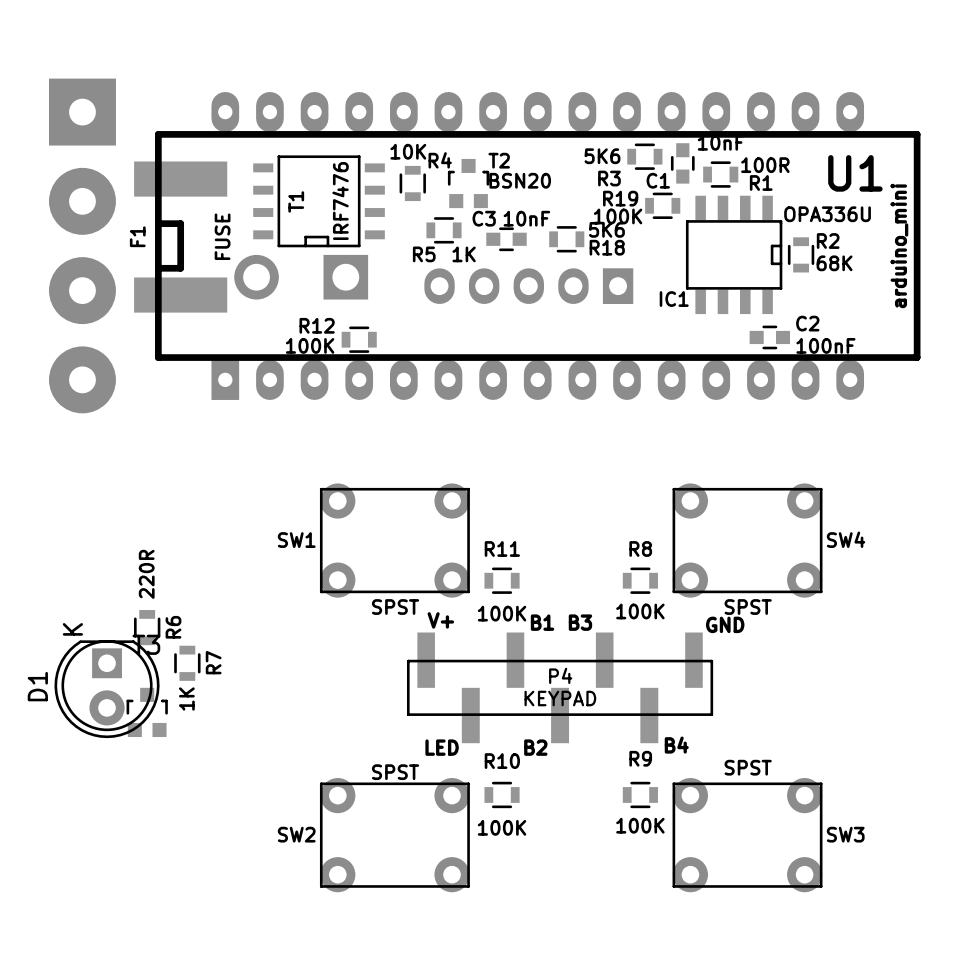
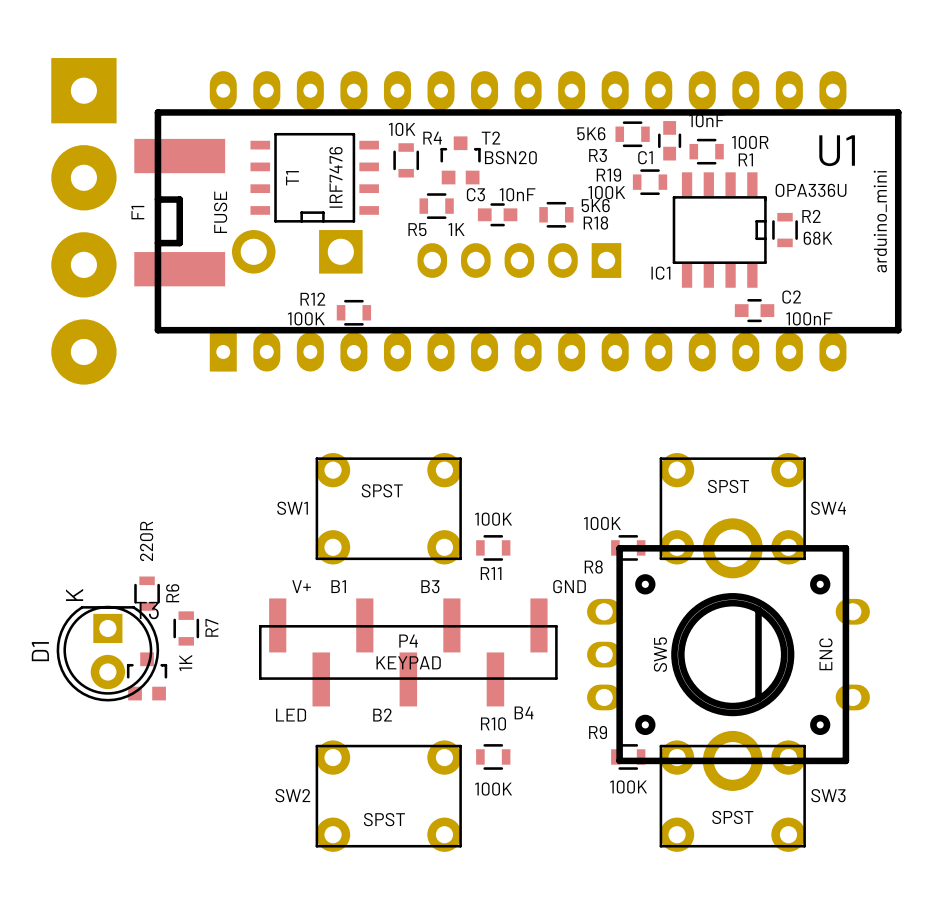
R11 name position: R11 (502, 548) -> R11 (491, 573)
R8 name position: R8 (640, 548) -> R8 (593, 567)
SW1 value position: SPST (395, 607) -> SPST (382, 490)
SW4 value position: SPST (748, 607) -> SPST (728, 486)
R8 value position: 100K (640, 611) -> 100K (602, 523)
R11 value position: 100K (502, 613) -> 100K (493, 519)
text position: V+ (440, 620) -> V+ (301, 586)
text position: B1 (542, 622) -> B1 (338, 586)
text position: B3 (580, 622) -> B3 (430, 586)
text position: GND (725, 624) -> GND (569, 586)
P4 position: (560, 687) -> (408, 652)
SW5: none -> ENC (728, 654)
text position: B4 (676, 745) -> B4 (524, 712)
text position: LED (442, 747) -> LED (291, 715)
text position: B2 (535, 747) -> B2 (382, 715)
R9 name position: R9 (640, 758) -> R9 (598, 732)
SW3 value position: SPST (748, 767) -> SPST (732, 817)
SW2 value position: SPST (395, 772) -> SPST (384, 819)

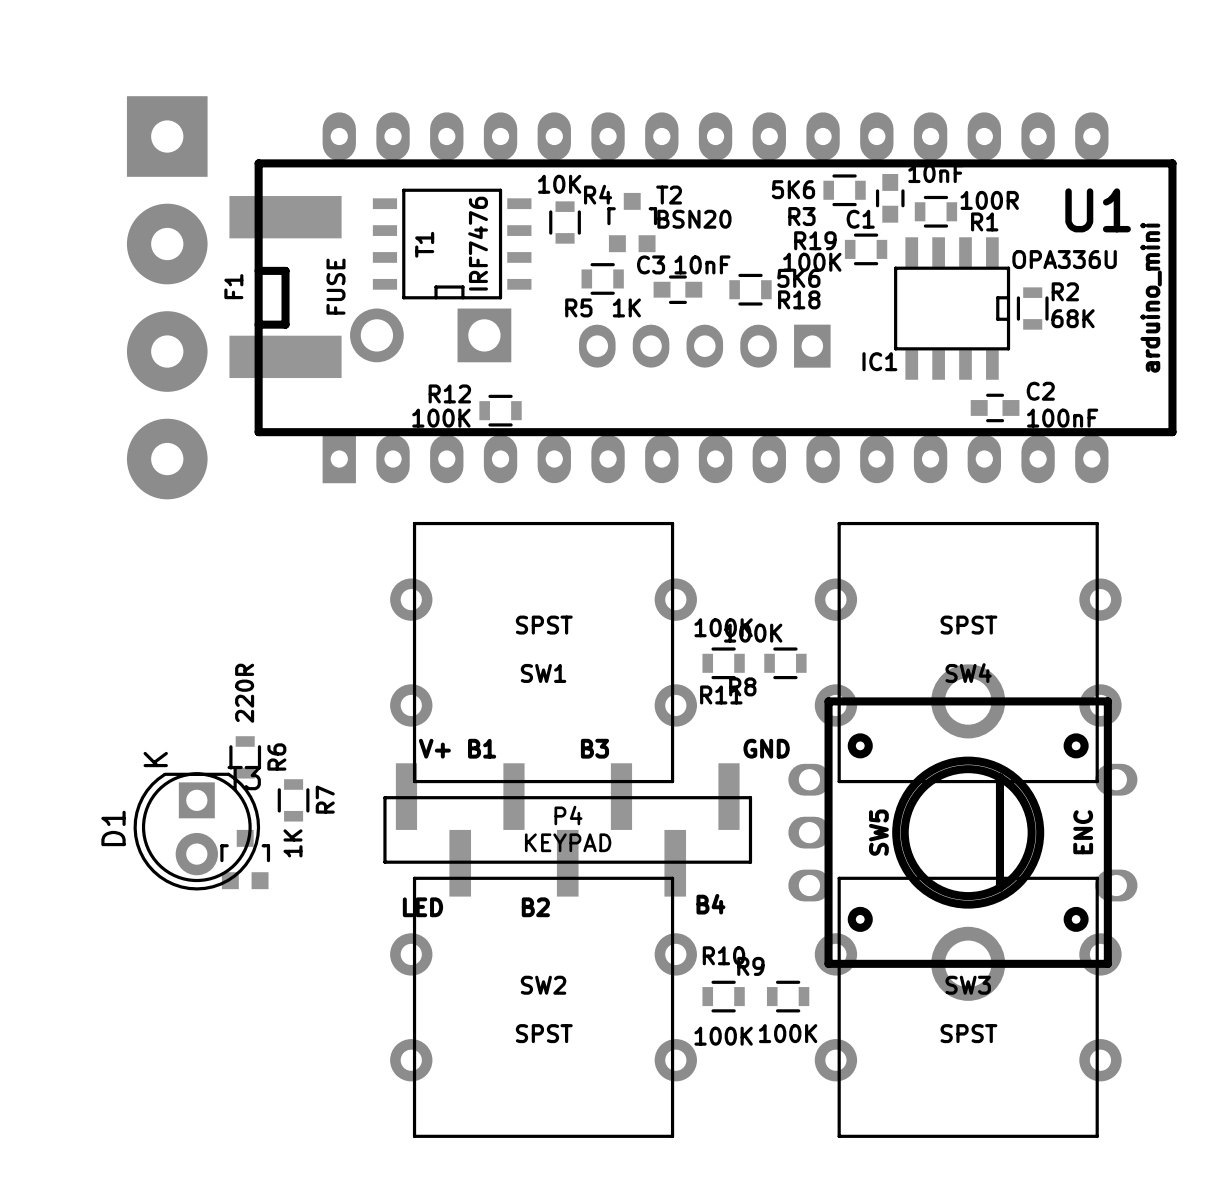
SW1 footprint: [315, 453, 462, 565] -> [390, 521, 697, 784]
SW4 footprint: [659, 453, 806, 565] -> [814, 521, 1122, 784]
SW1 name position: SW1 (292, 508) -> SW1 (543, 673)
SW4 name position: SW4 (828, 508) -> SW4 (968, 673)
R11 position: (493, 547) -> (723, 663)
R8 position: (628, 547) -> (785, 663)
SW2 footprint: [315, 740, 462, 852] -> [390, 876, 697, 1138]
SW3 footprint: [659, 740, 806, 852] -> [814, 876, 1122, 1138]
R10 position: (493, 756) -> (723, 996)
R9 position: (628, 756) -> (788, 996)
SW2 name position: SW2 (292, 795) -> SW2 (543, 985)
SW3 name position: SW3 (828, 795) -> SW3 (968, 985)

